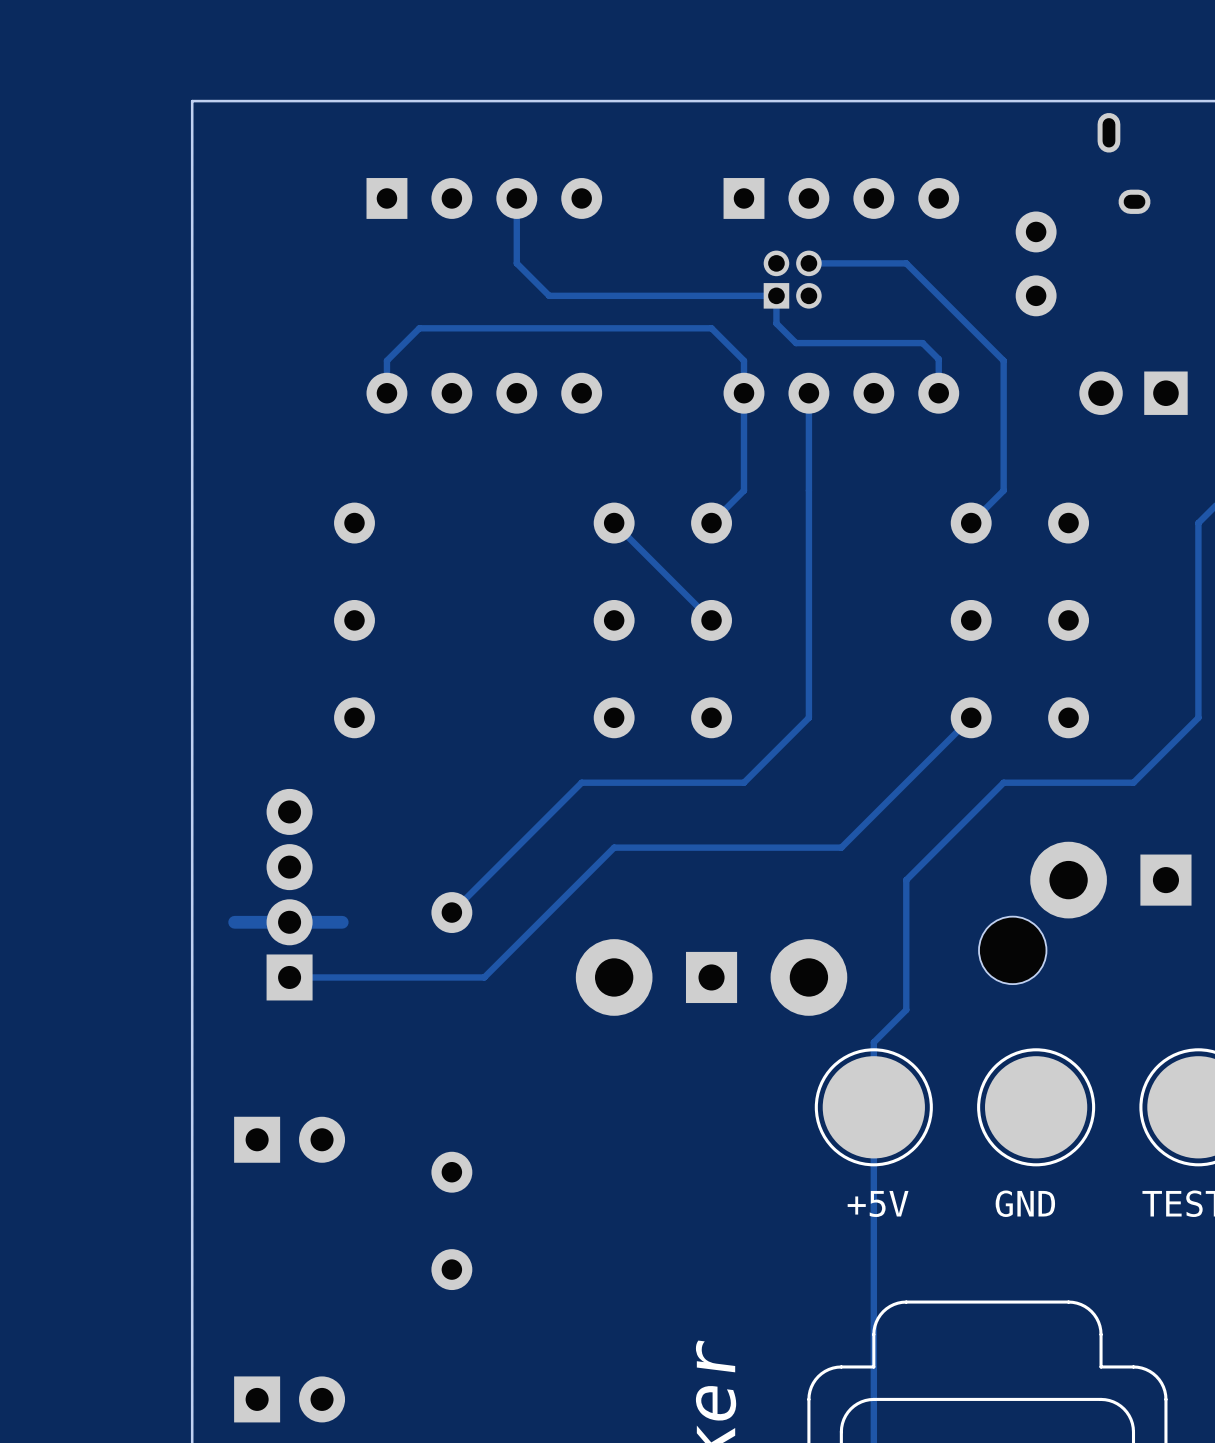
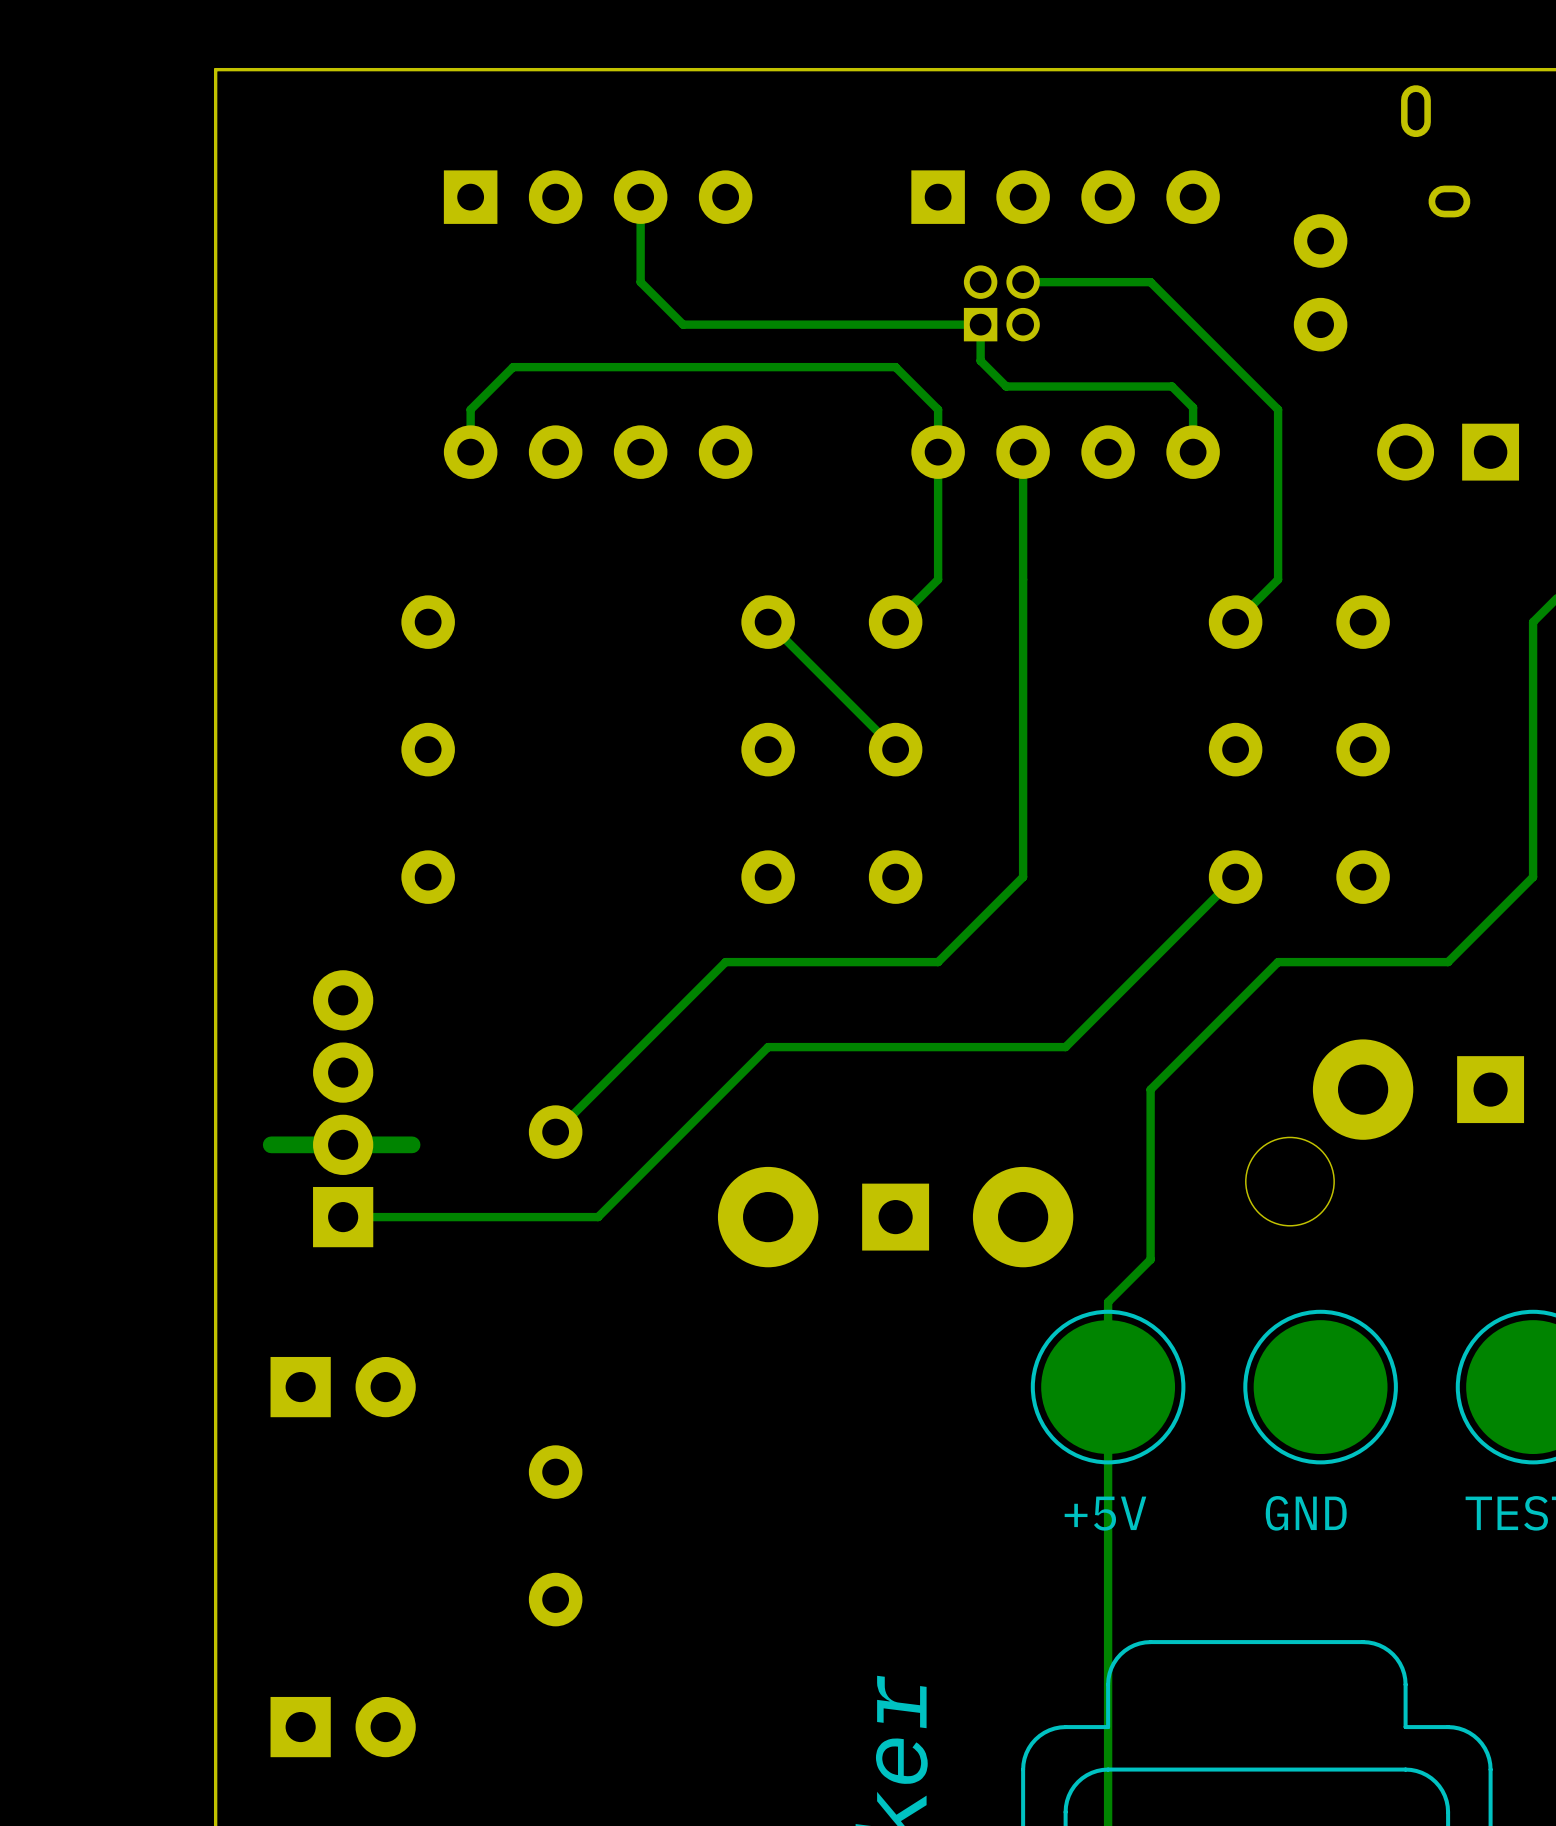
part position: (289, 1139) -> (343, 1387)
part position: (289, 1399) -> (343, 1727)

